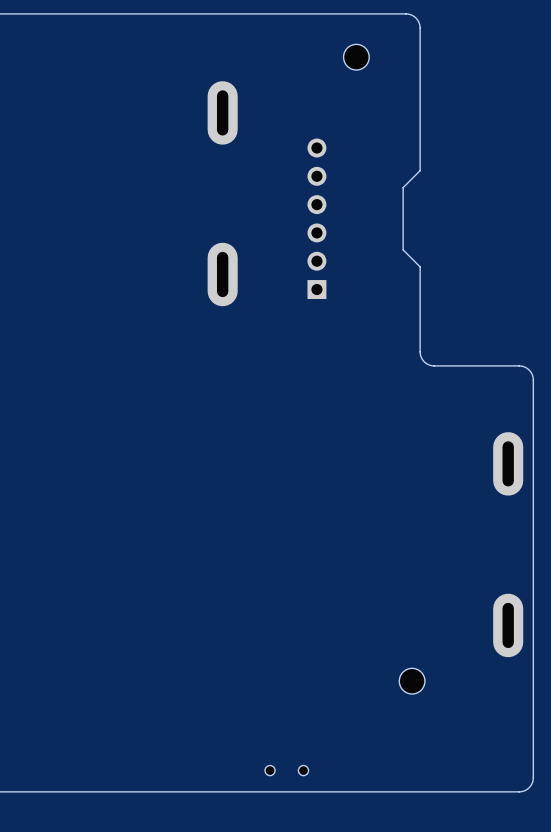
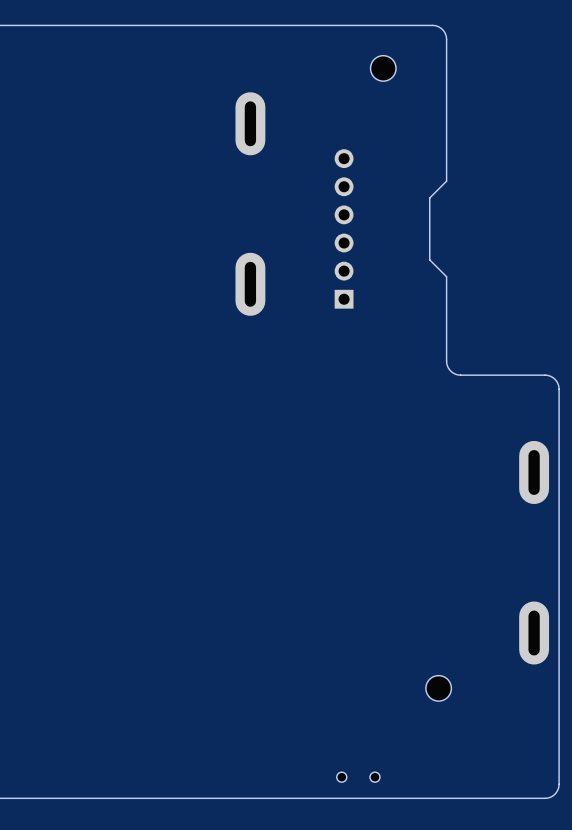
part position: (286, 770) -> (358, 777)

